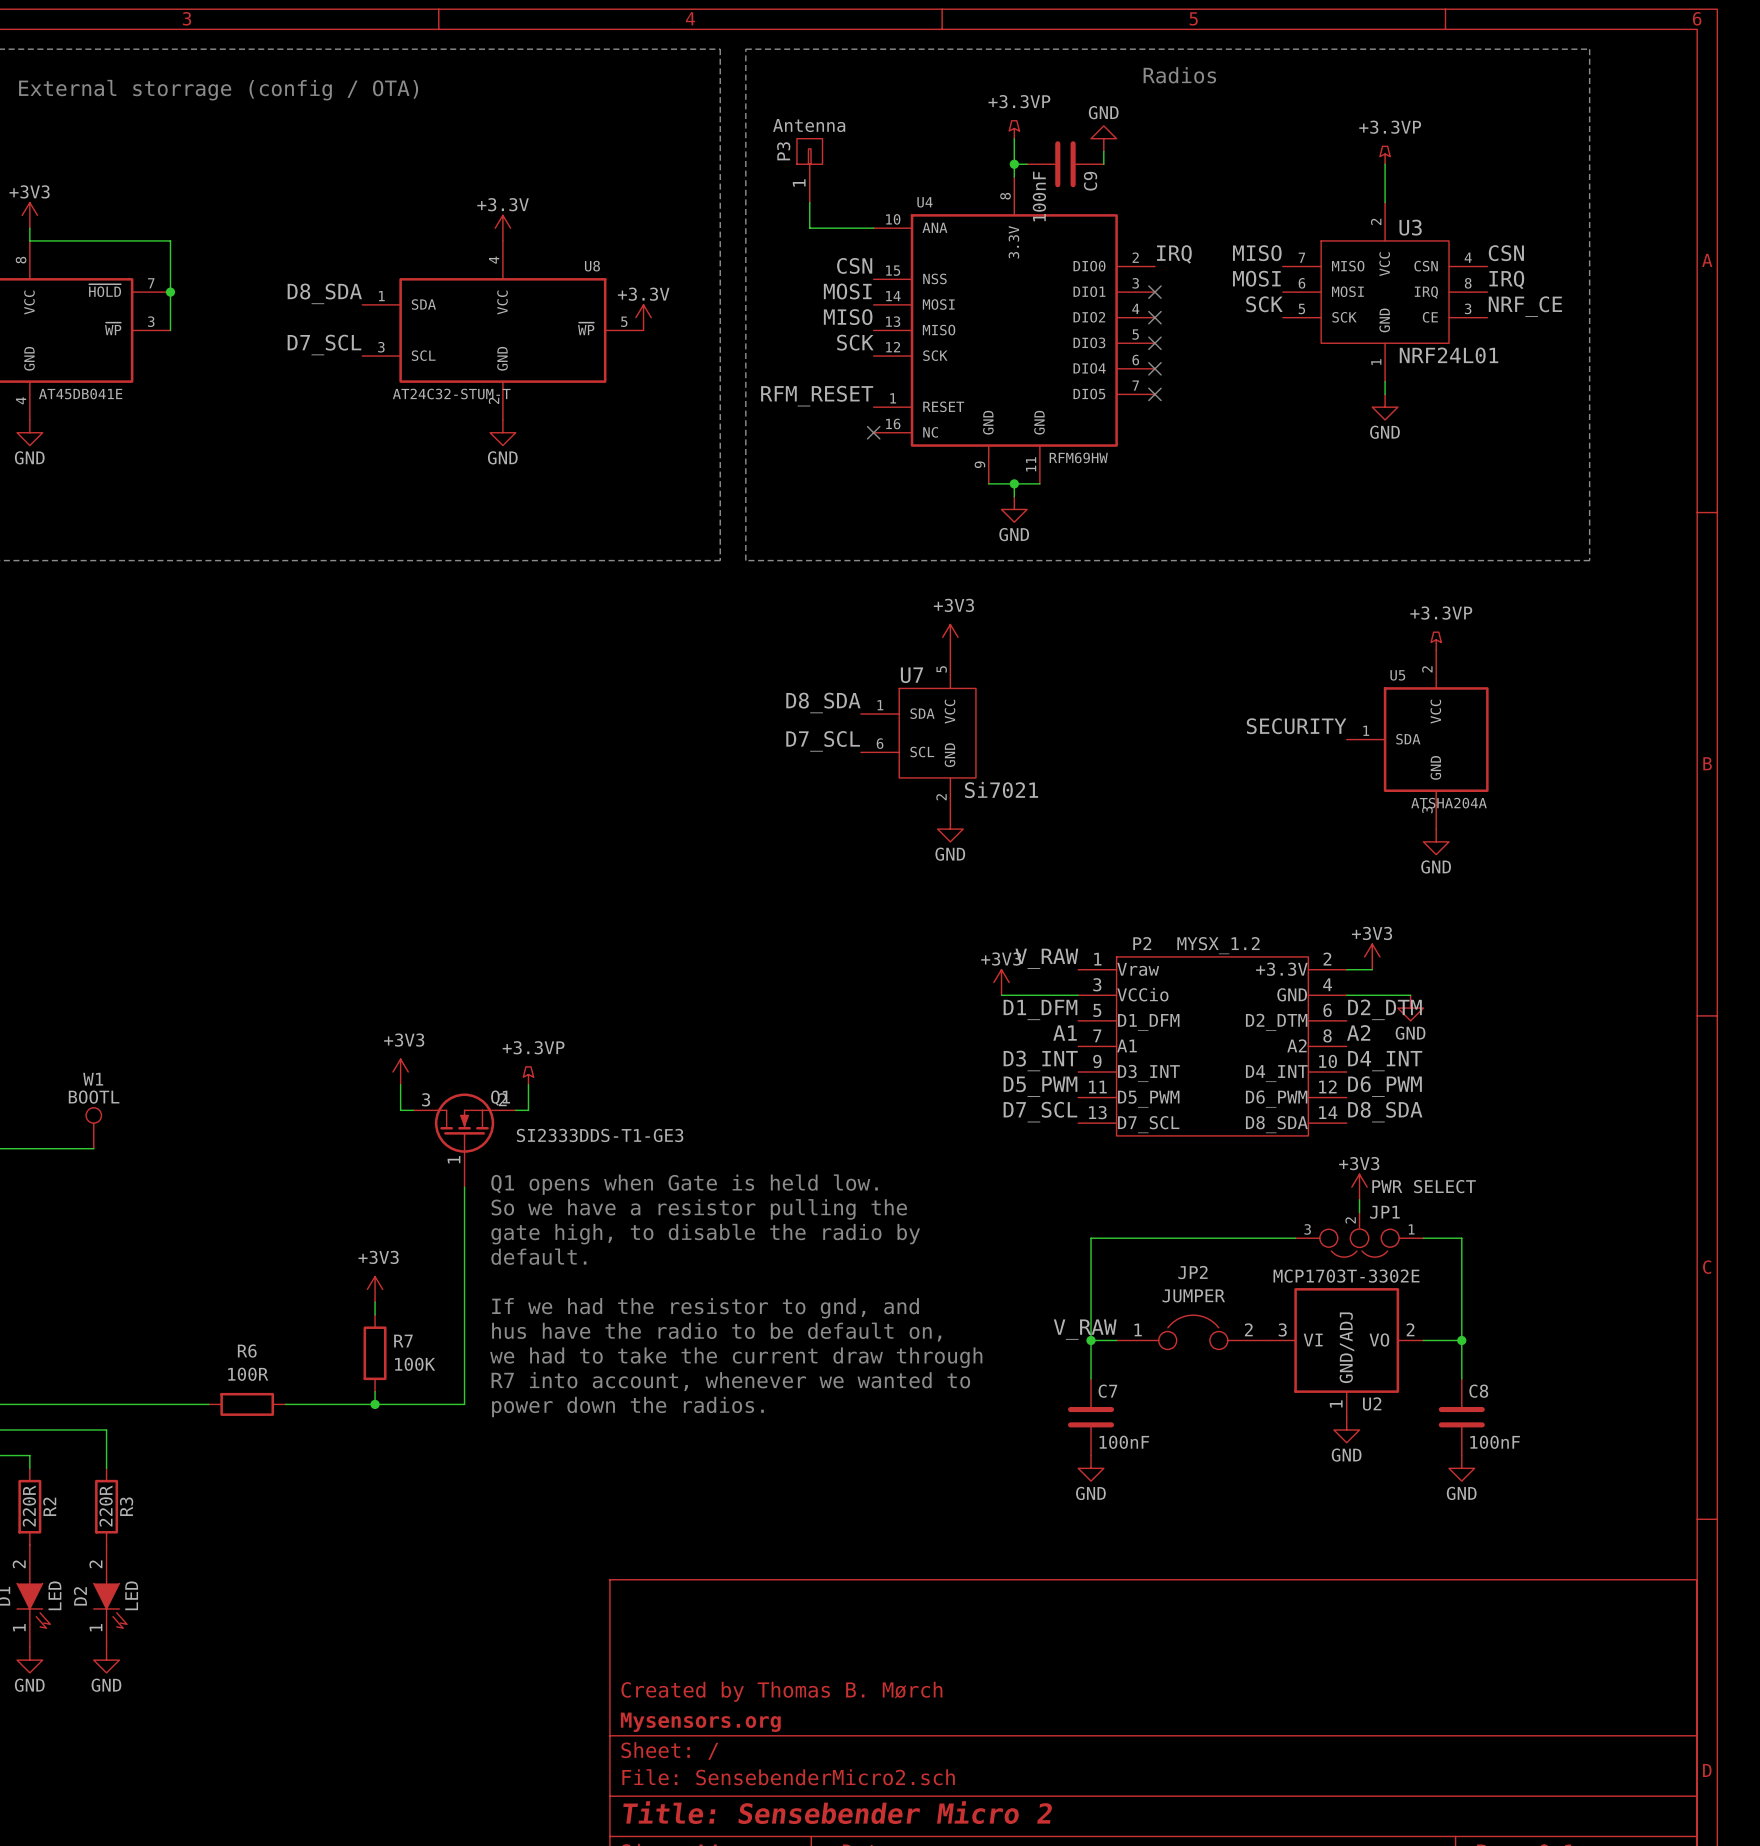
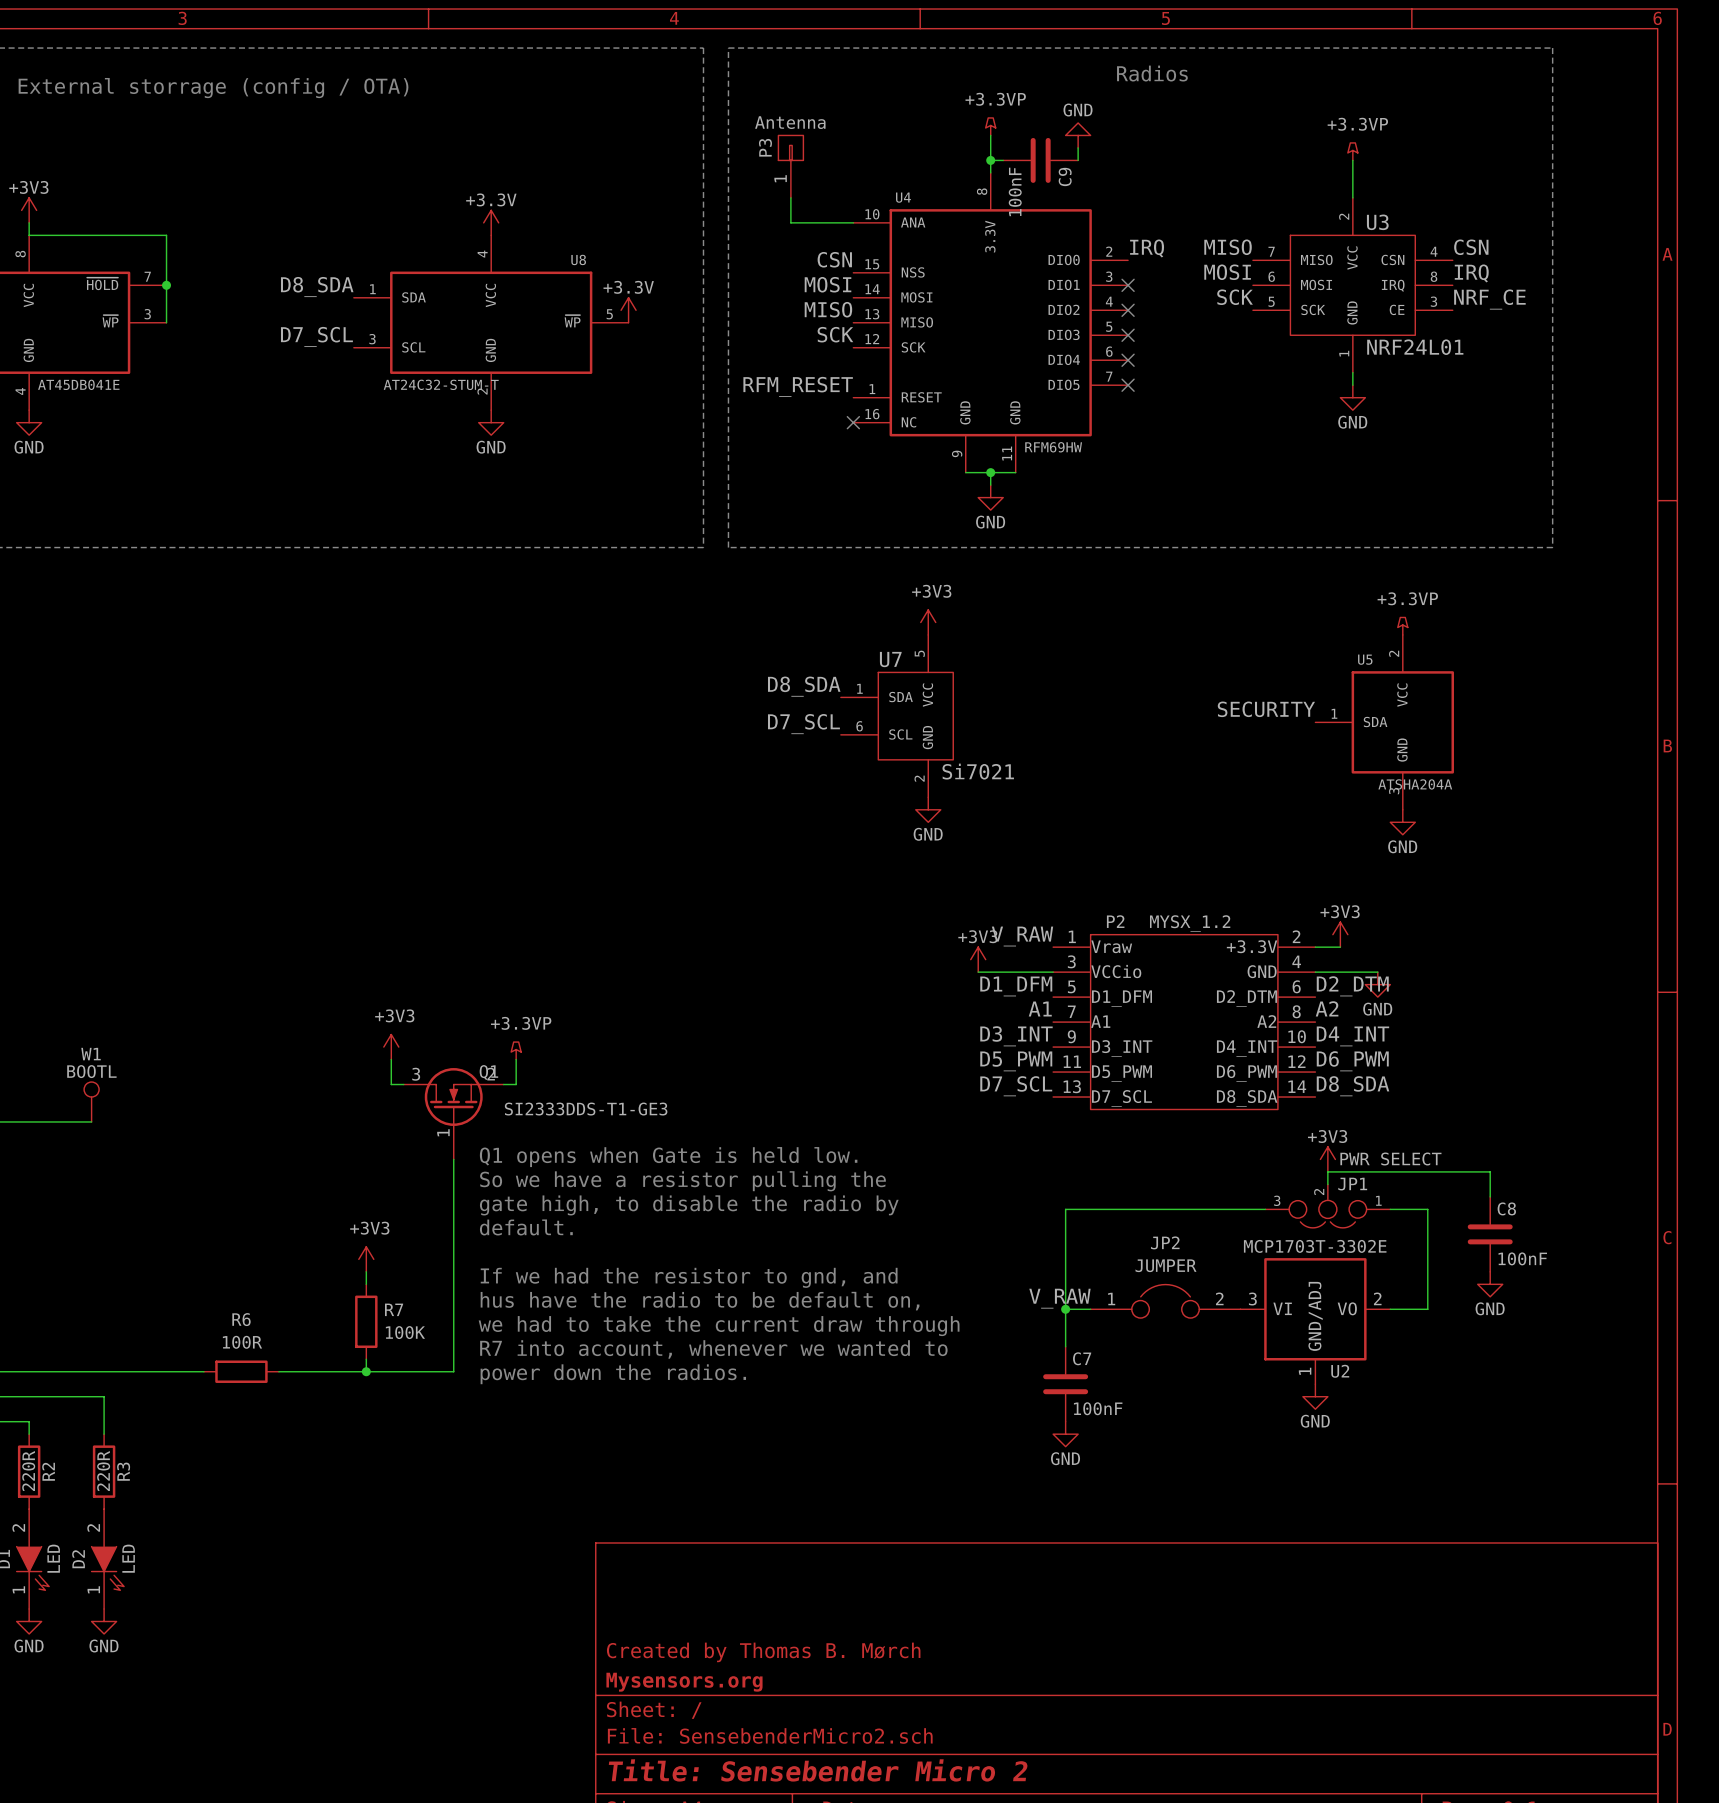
wire: none -> (1327, 1171) (1490, 1171) (1490, 1196)
wire: (1461, 1340) (1461, 1378) -> none
junction: (1461, 1340) -> none
C8 position: (1461, 1417) -> (1490, 1234)
power symbol position: GND (1461, 1468) -> GND (1490, 1284)

